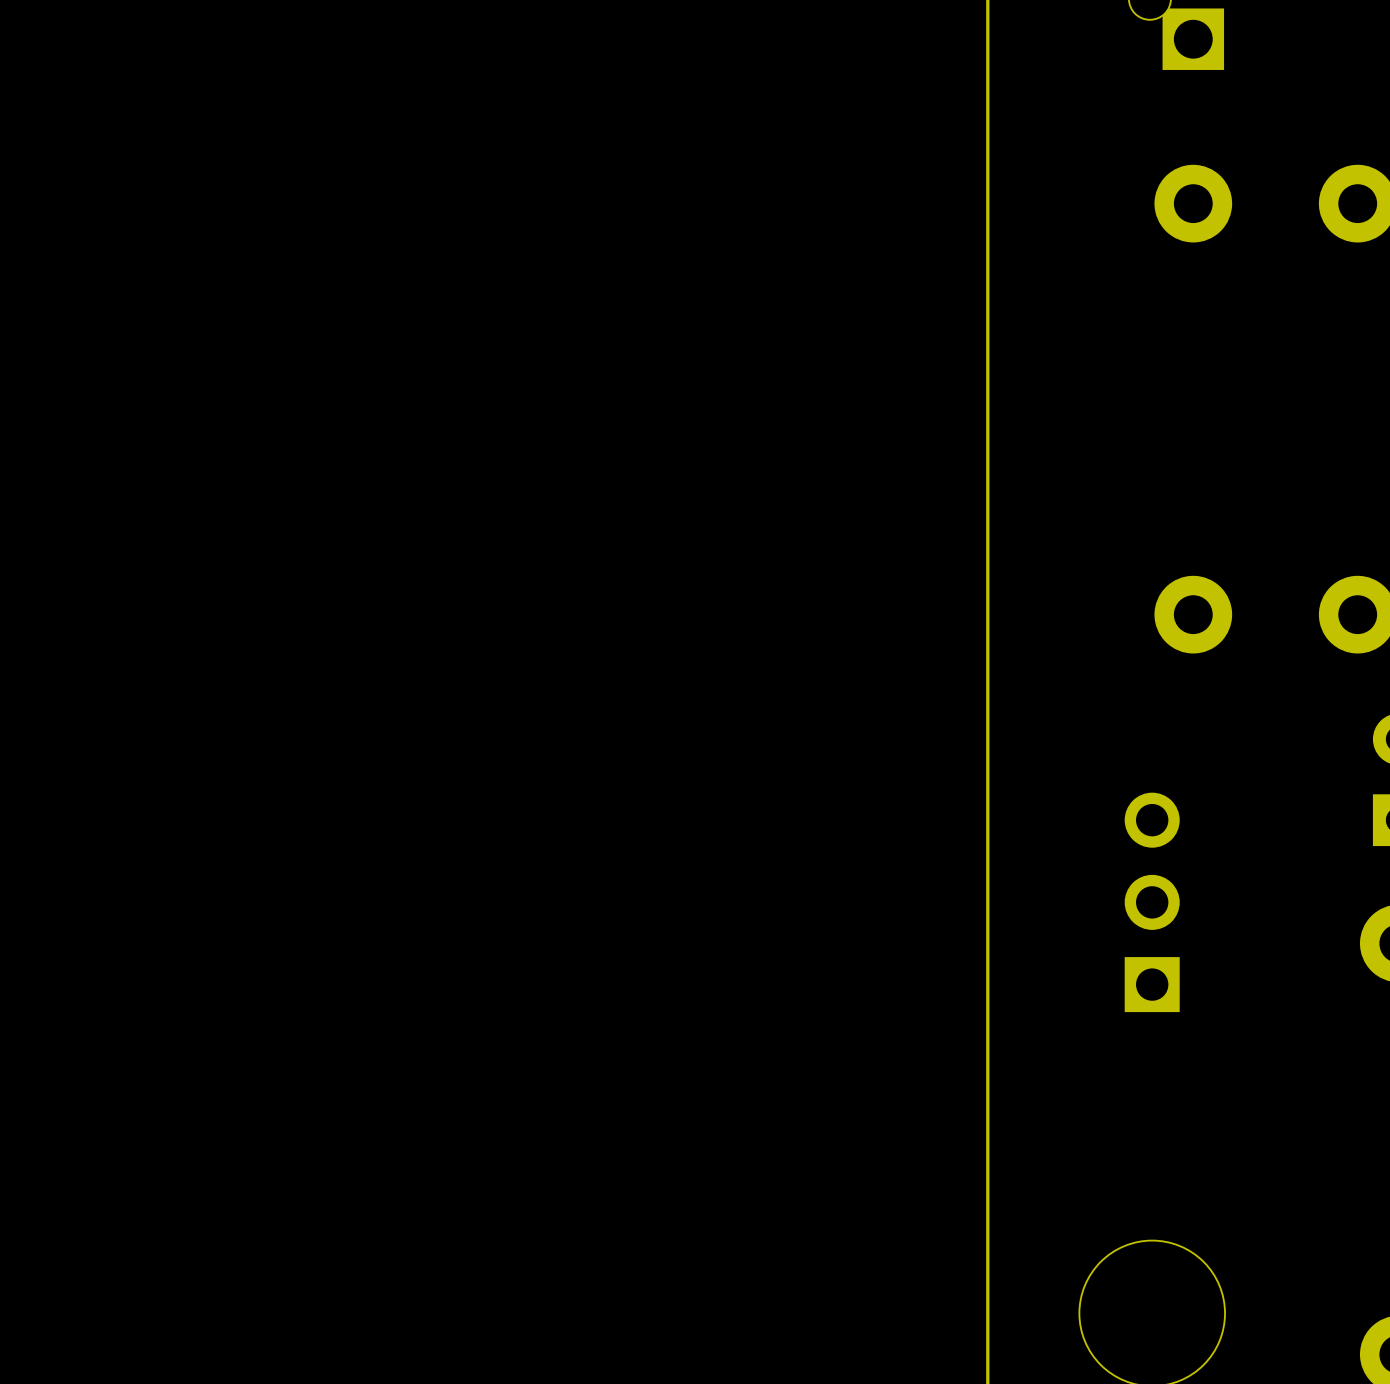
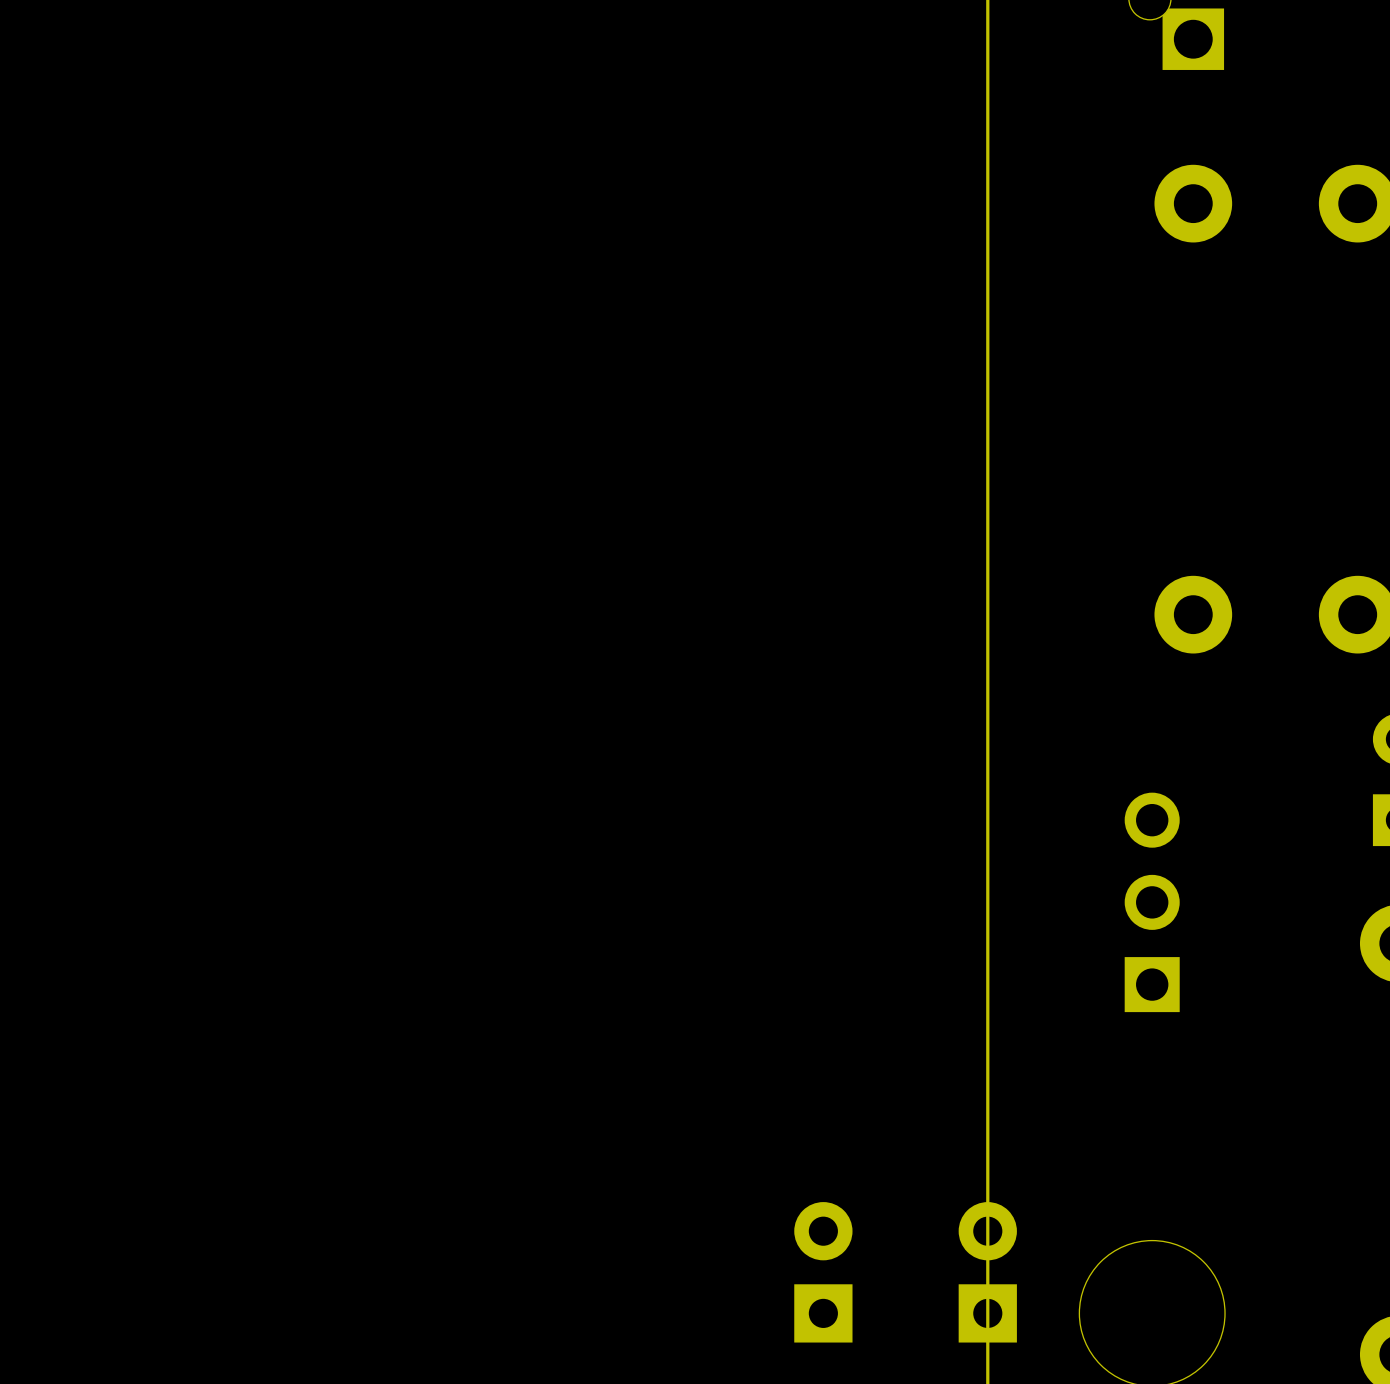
part: none -> (823, 1272)
part: none -> (987, 1272)

